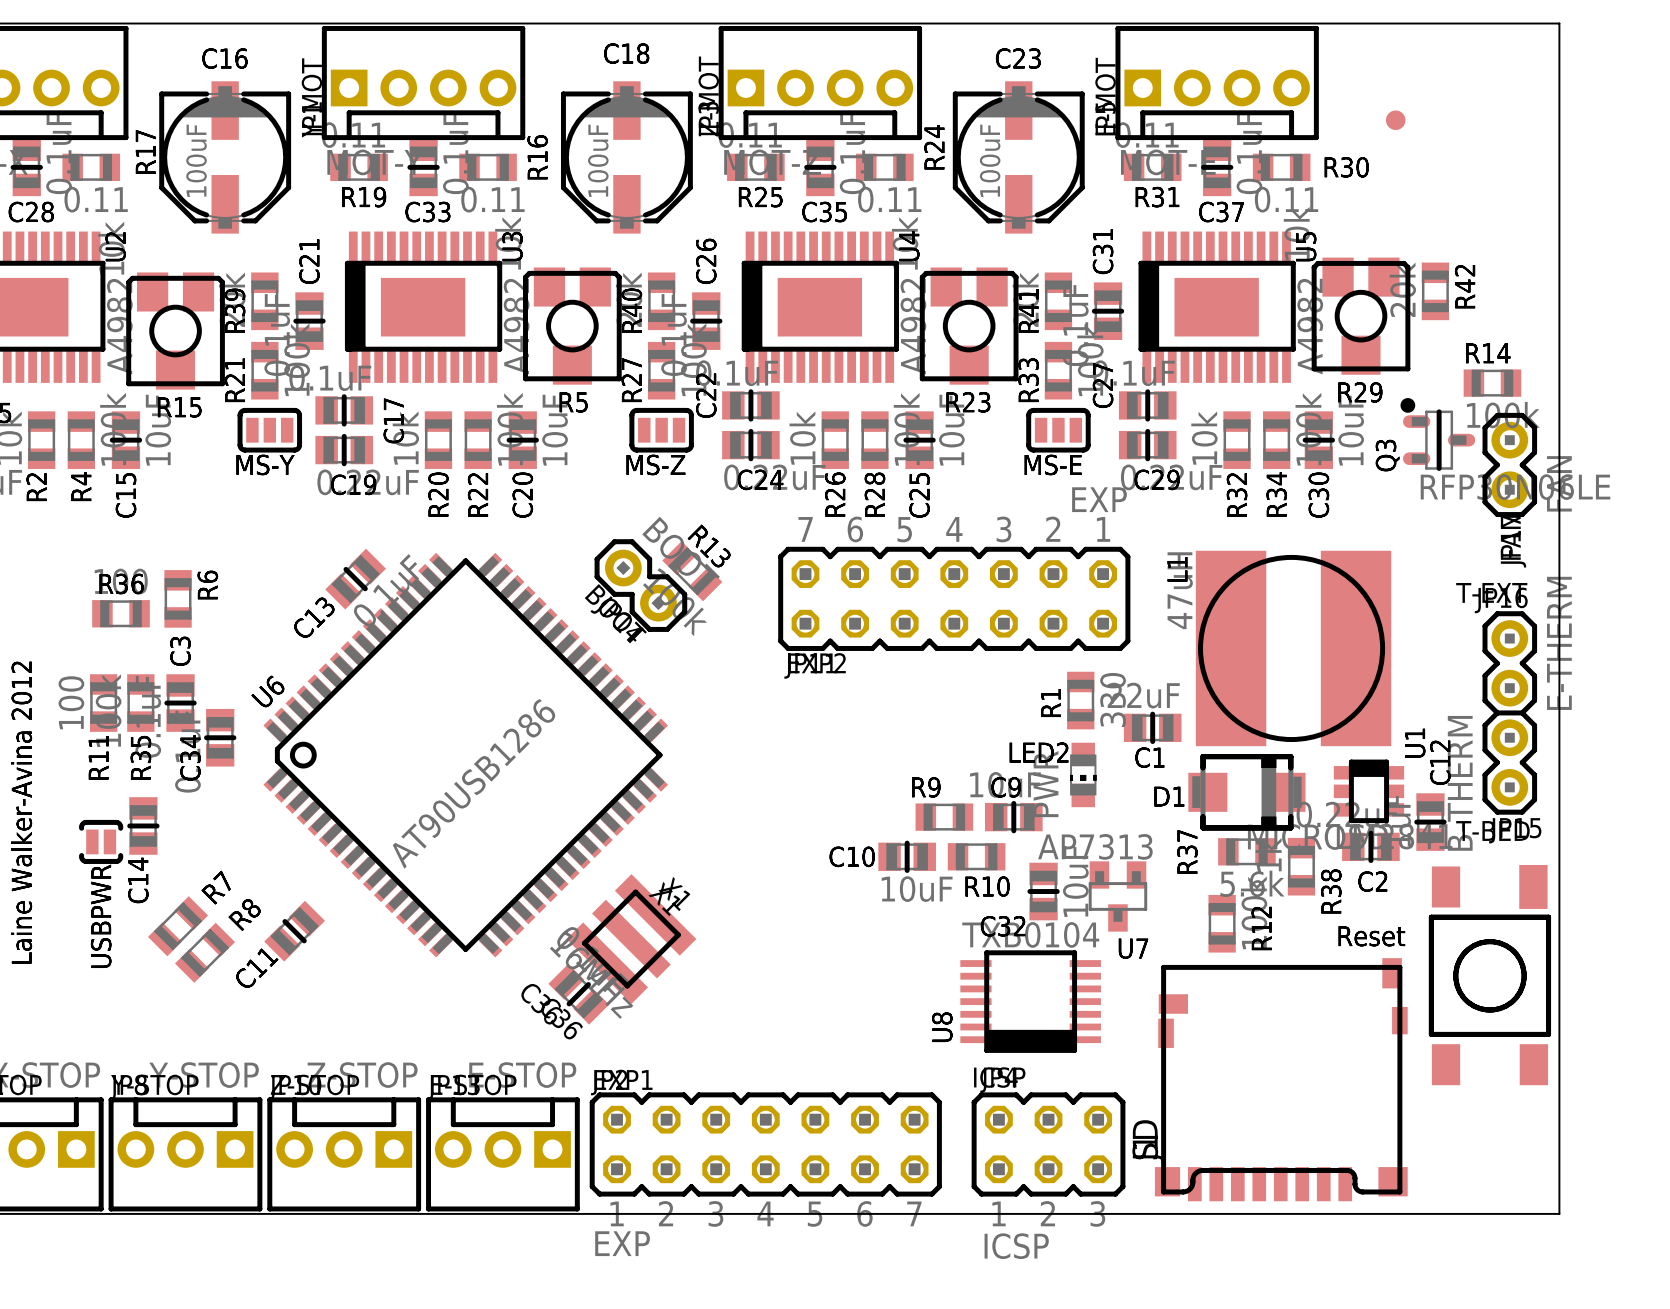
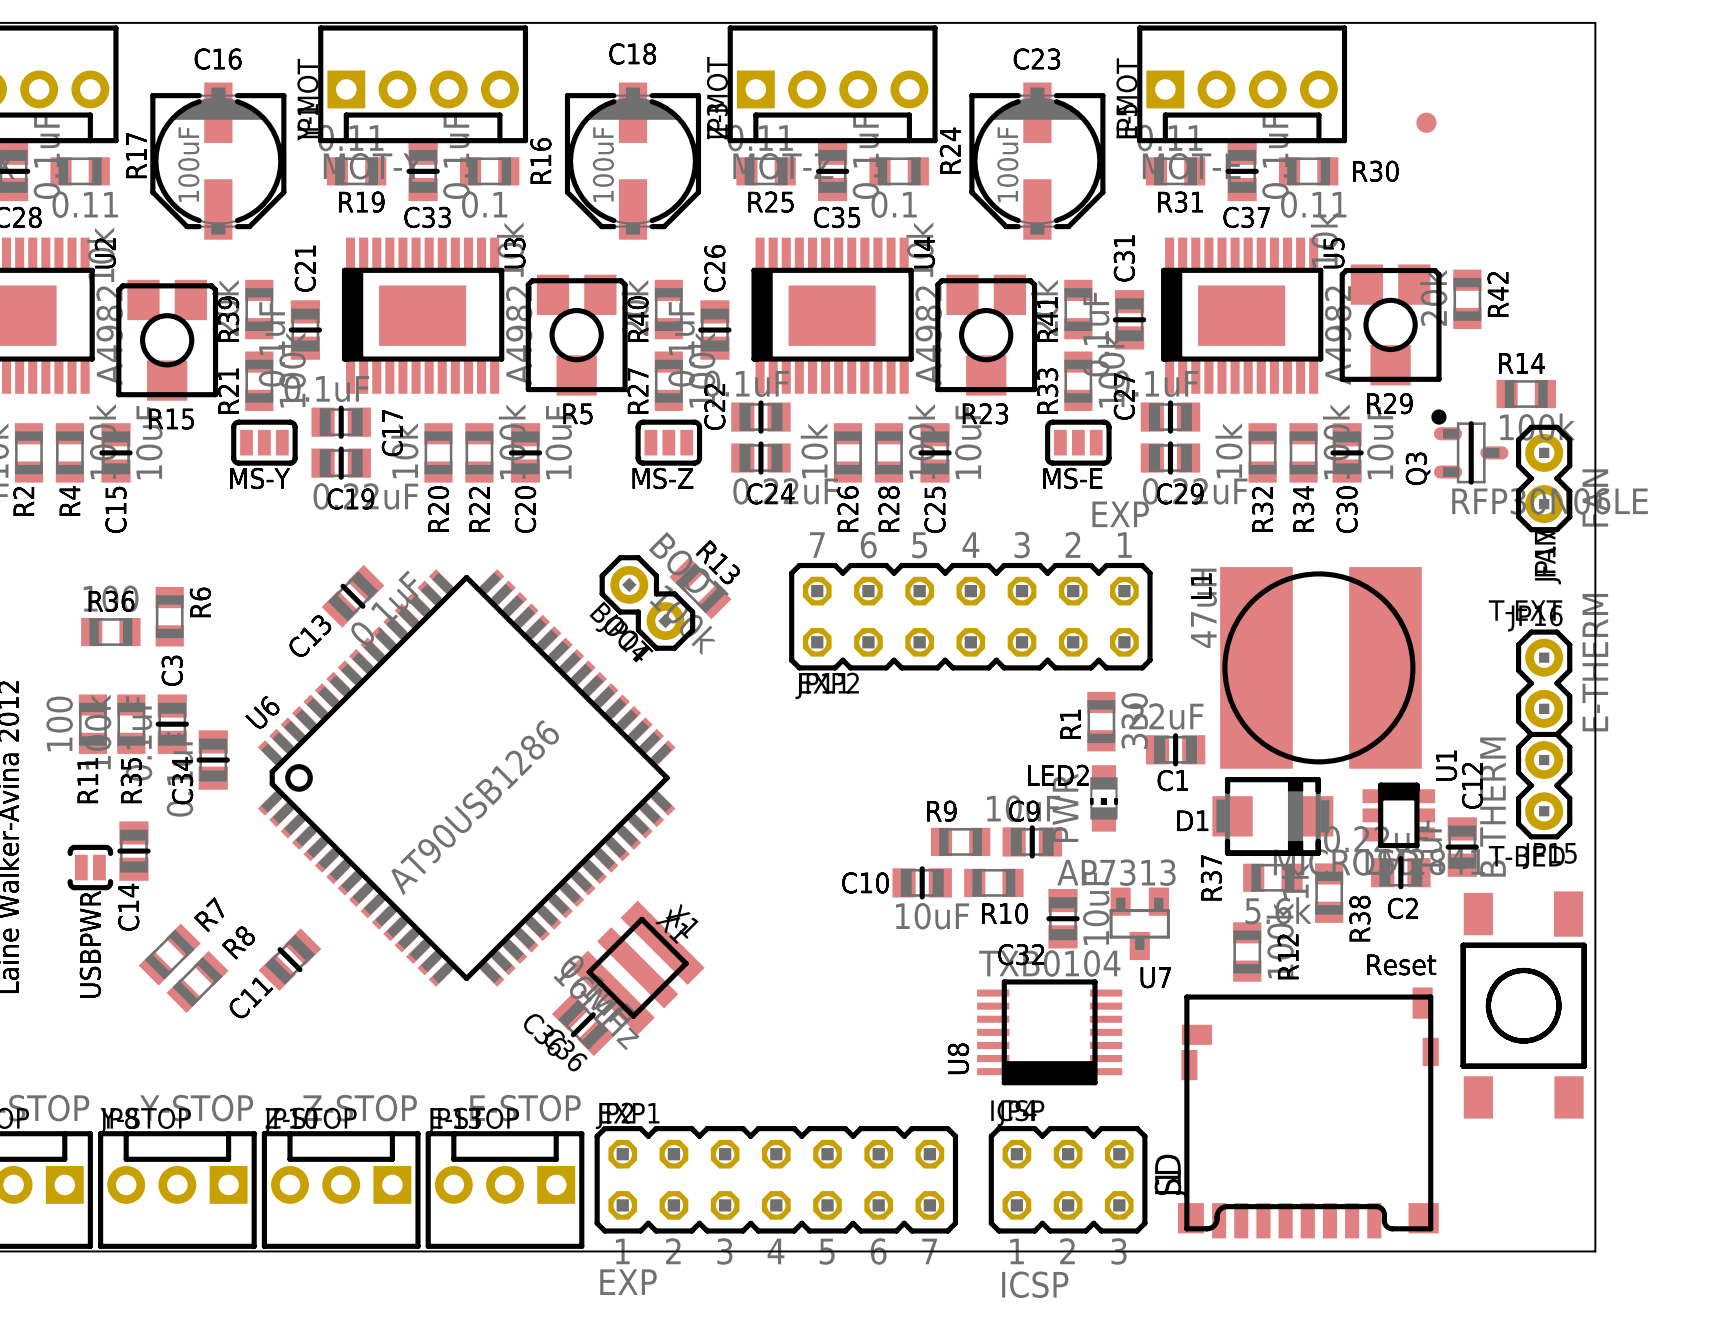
part value: 0.11 (492, 199) -> 0.1 (484, 204)
part value: 0.11 (889, 199) -> 0.1 (894, 204)

